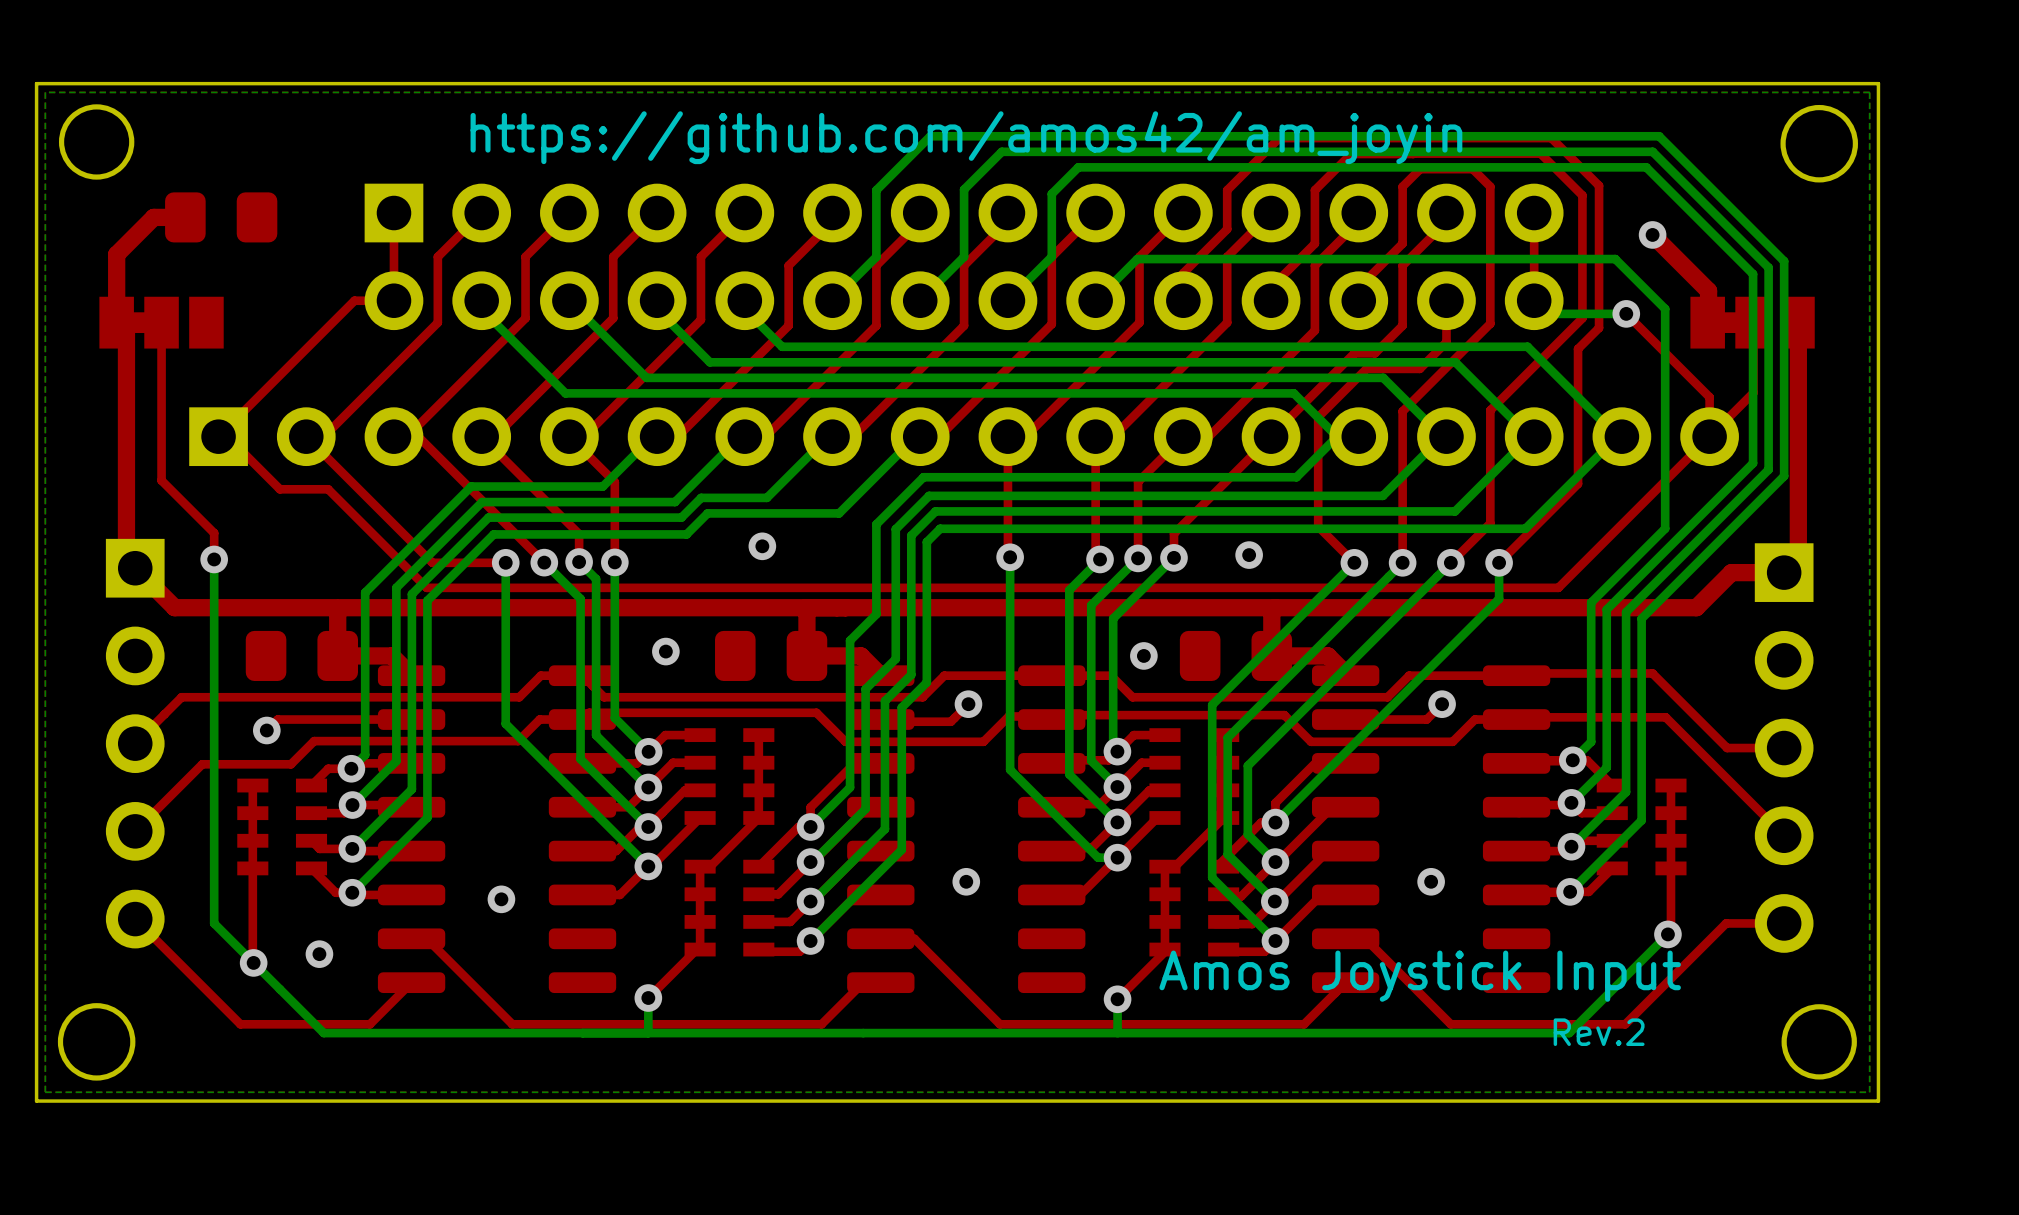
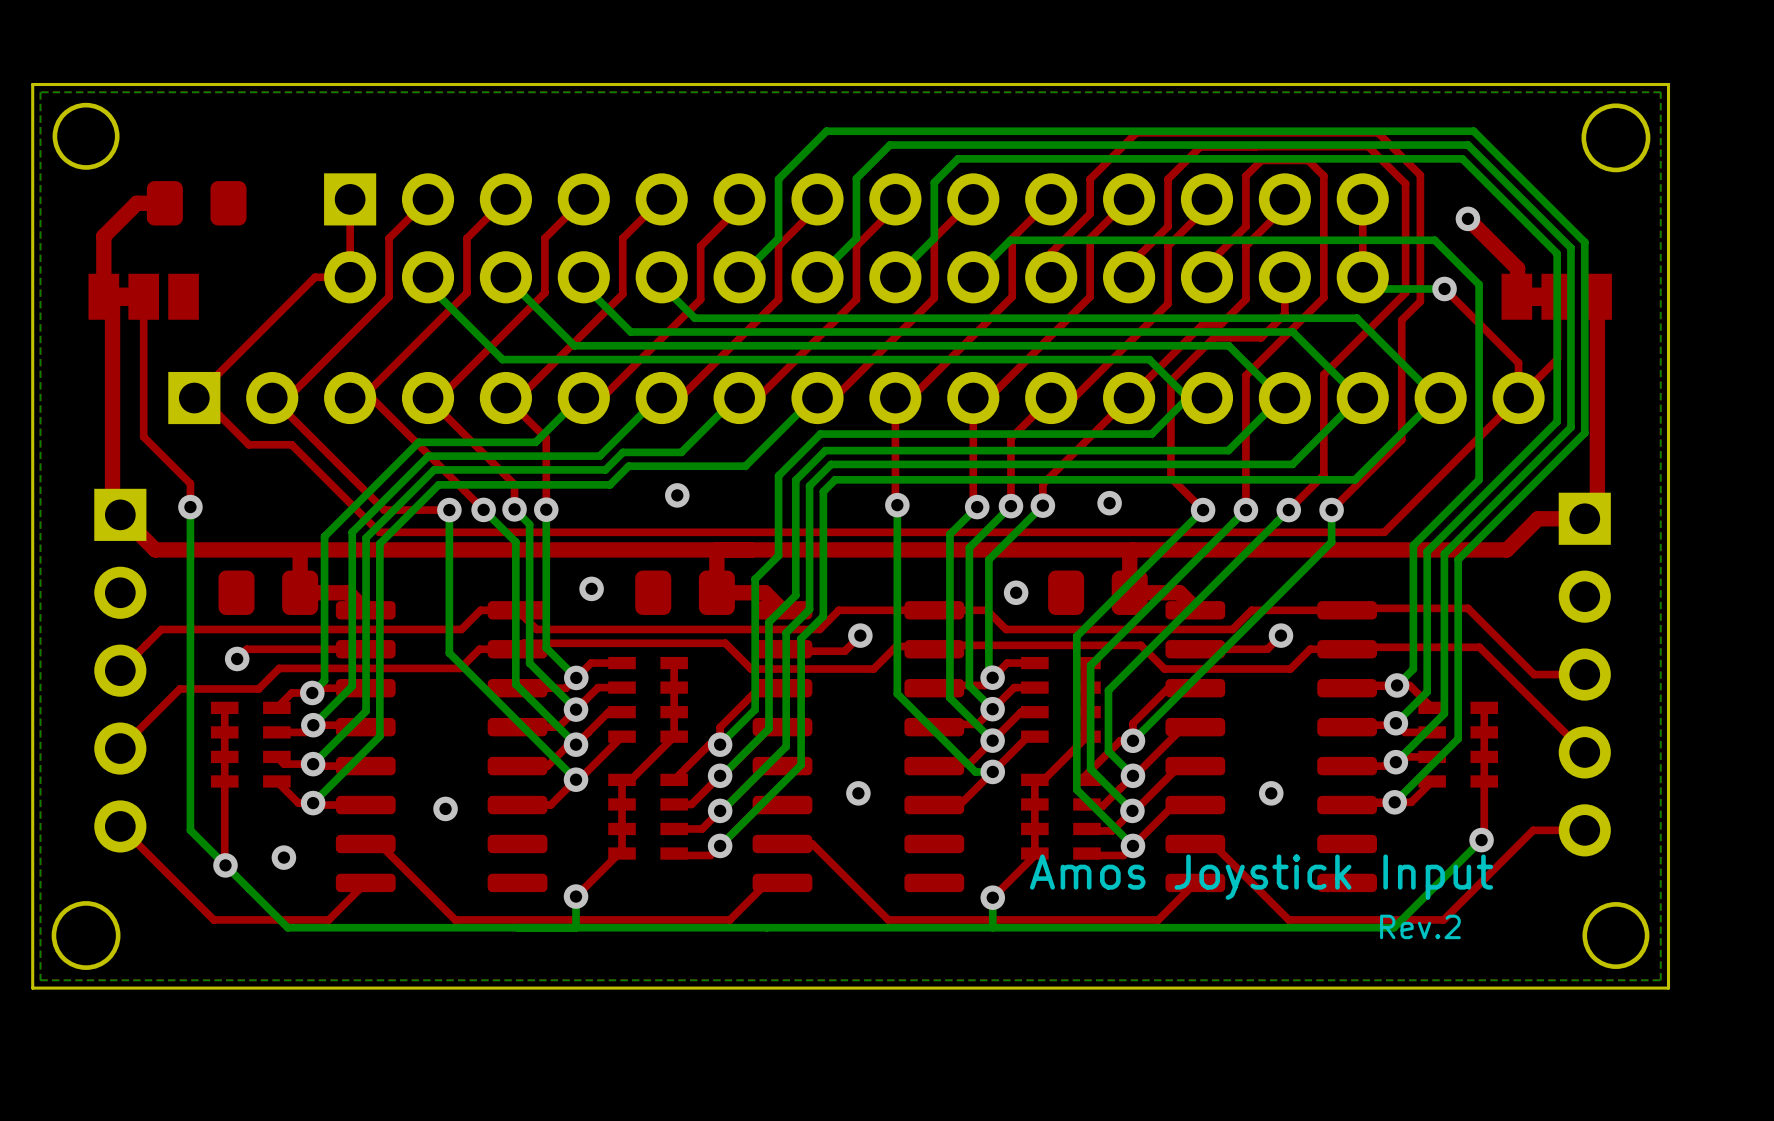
text: https://github.com/amos42/am_joyin (966, 137) -> none

